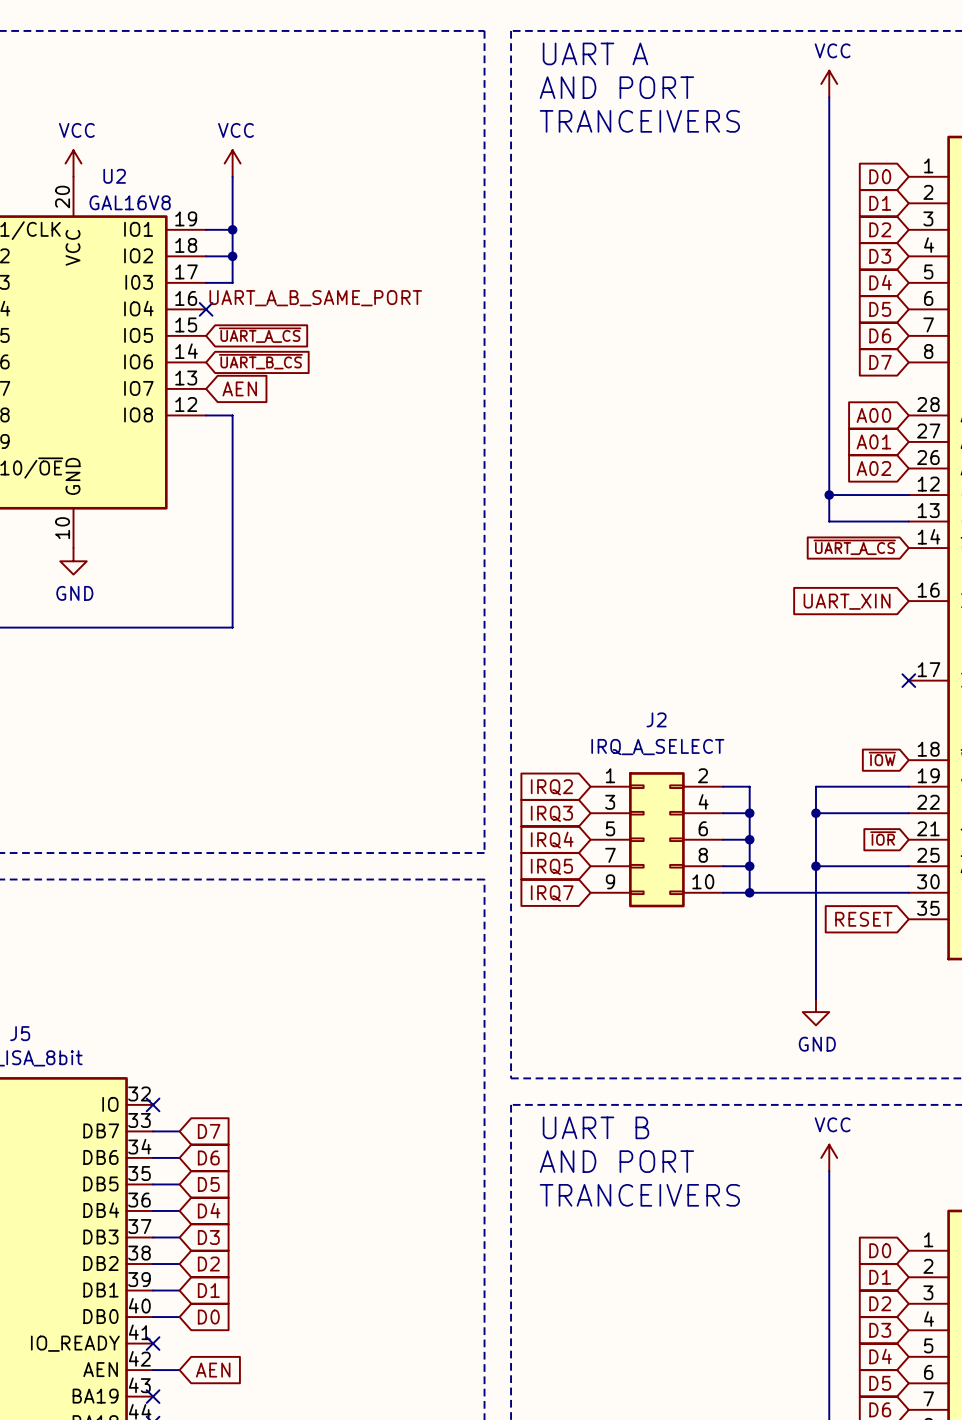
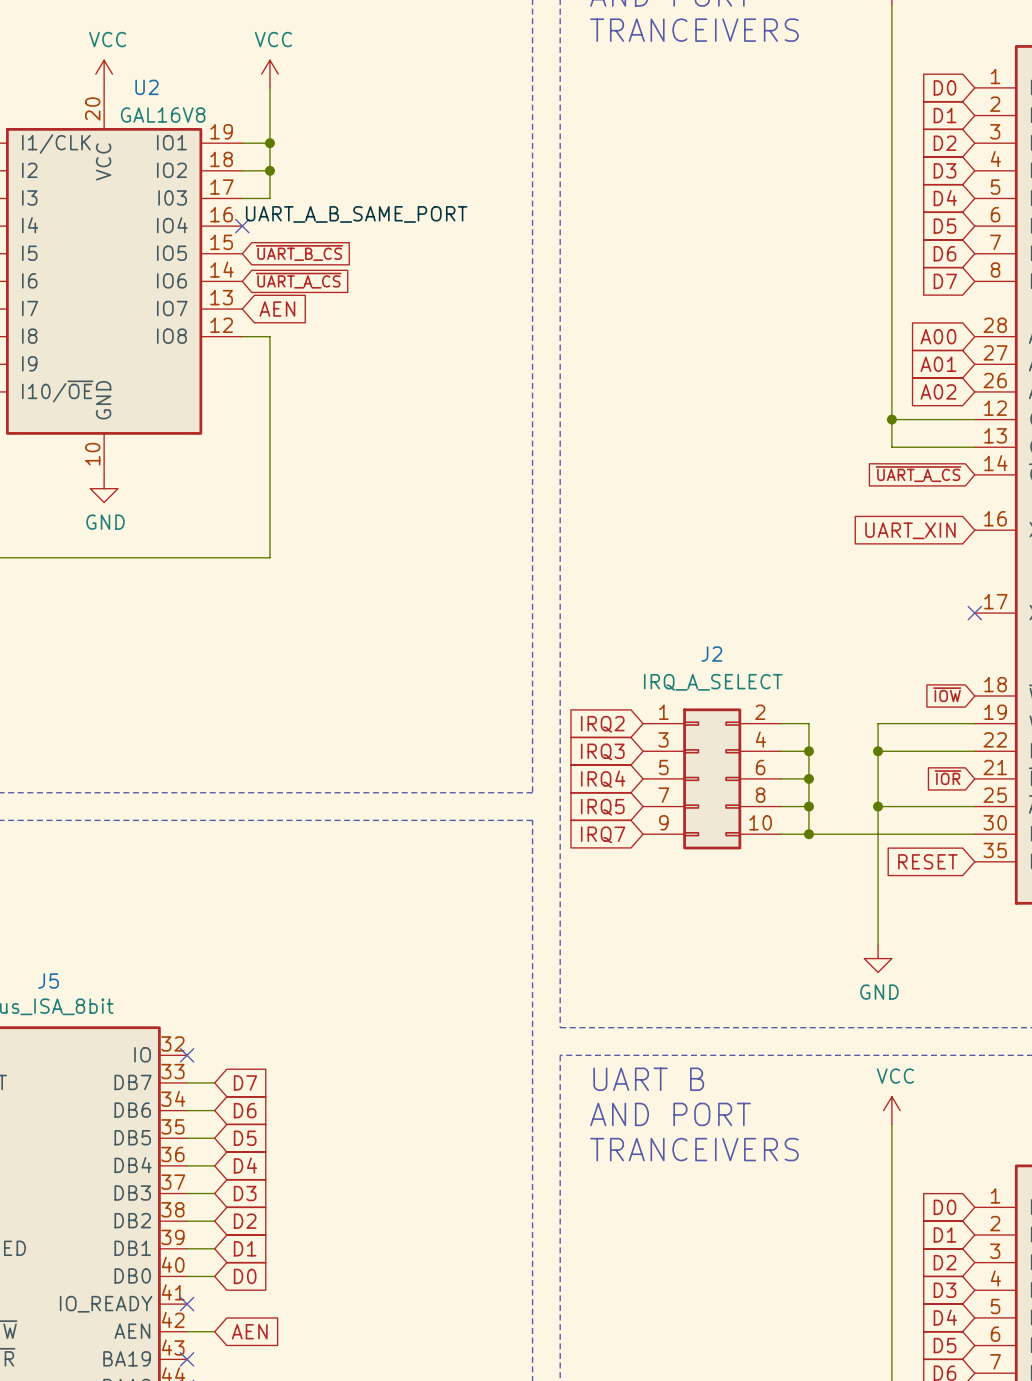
global label: ~{UART_A_CS} (260, 335) -> ~{UART_B_CS} (299, 253)
global label: ~{UART_B_CS} (260, 361) -> ~{UART_A_CS} (298, 280)

